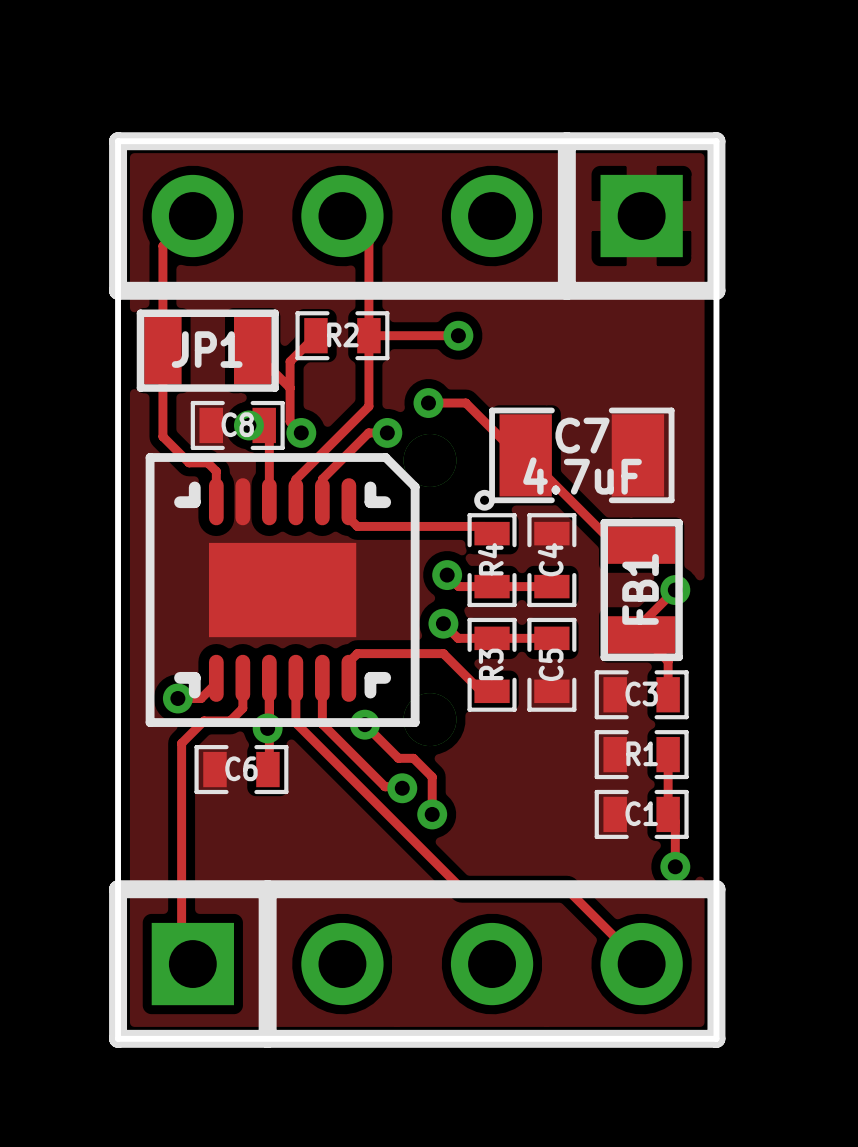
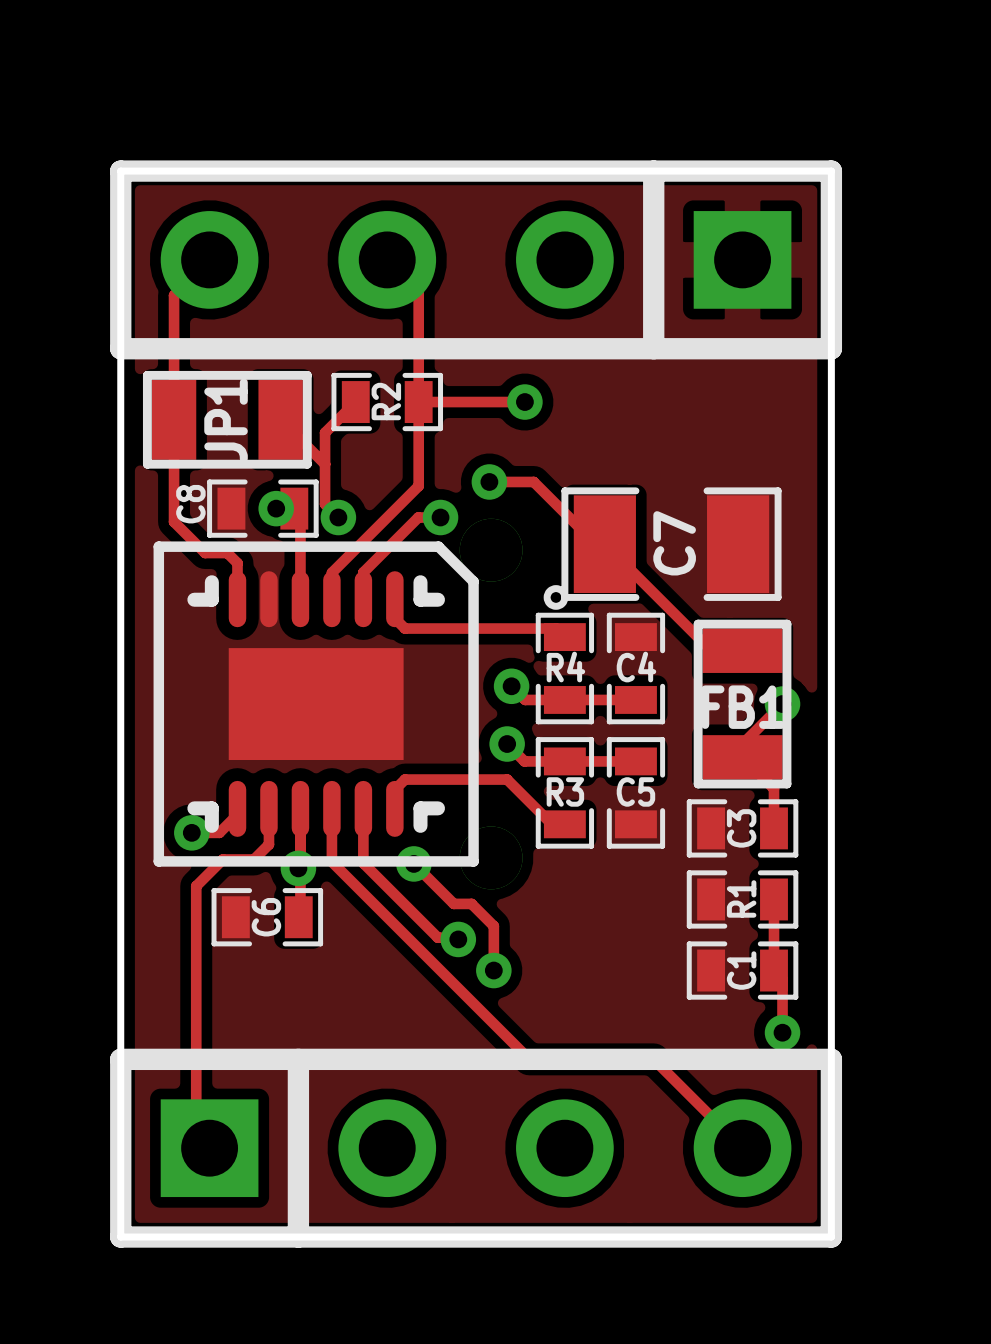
R2 name rotation: 0° (342, 334) -> 90° counterclockwise (386, 401)
JP1 name rotation: 0° (207, 349) -> 90° counterclockwise (226, 420)
C8 name rotation: 0° (237, 424) -> 90° counterclockwise (190, 504)
C8 name position: C8 (237, 424) -> C8 (190, 504)
C7 name rotation: 0° (582, 435) -> 90° counterclockwise (674, 543)
C7 value: 4.7uF (582, 476) -> none
R4 name rotation: 0° (490, 559) -> 90° clockwise (565, 667)
C4 name rotation: 0° (550, 559) -> 90° clockwise (636, 667)
FB1 name rotation: 0° (640, 589) -> 90° clockwise (743, 707)
R3 name rotation: 0° (491, 664) -> 90° clockwise (565, 791)
C5 name rotation: 0° (551, 664) -> 90° clockwise (635, 791)
C3 name rotation: 0° (641, 693) -> 90° counterclockwise (741, 828)
R1 name rotation: 0° (642, 753) -> 90° counterclockwise (741, 898)
C6 name rotation: 0° (241, 768) -> 90° counterclockwise (266, 917)
C1 name rotation: 0° (641, 813) -> 90° counterclockwise (741, 970)

